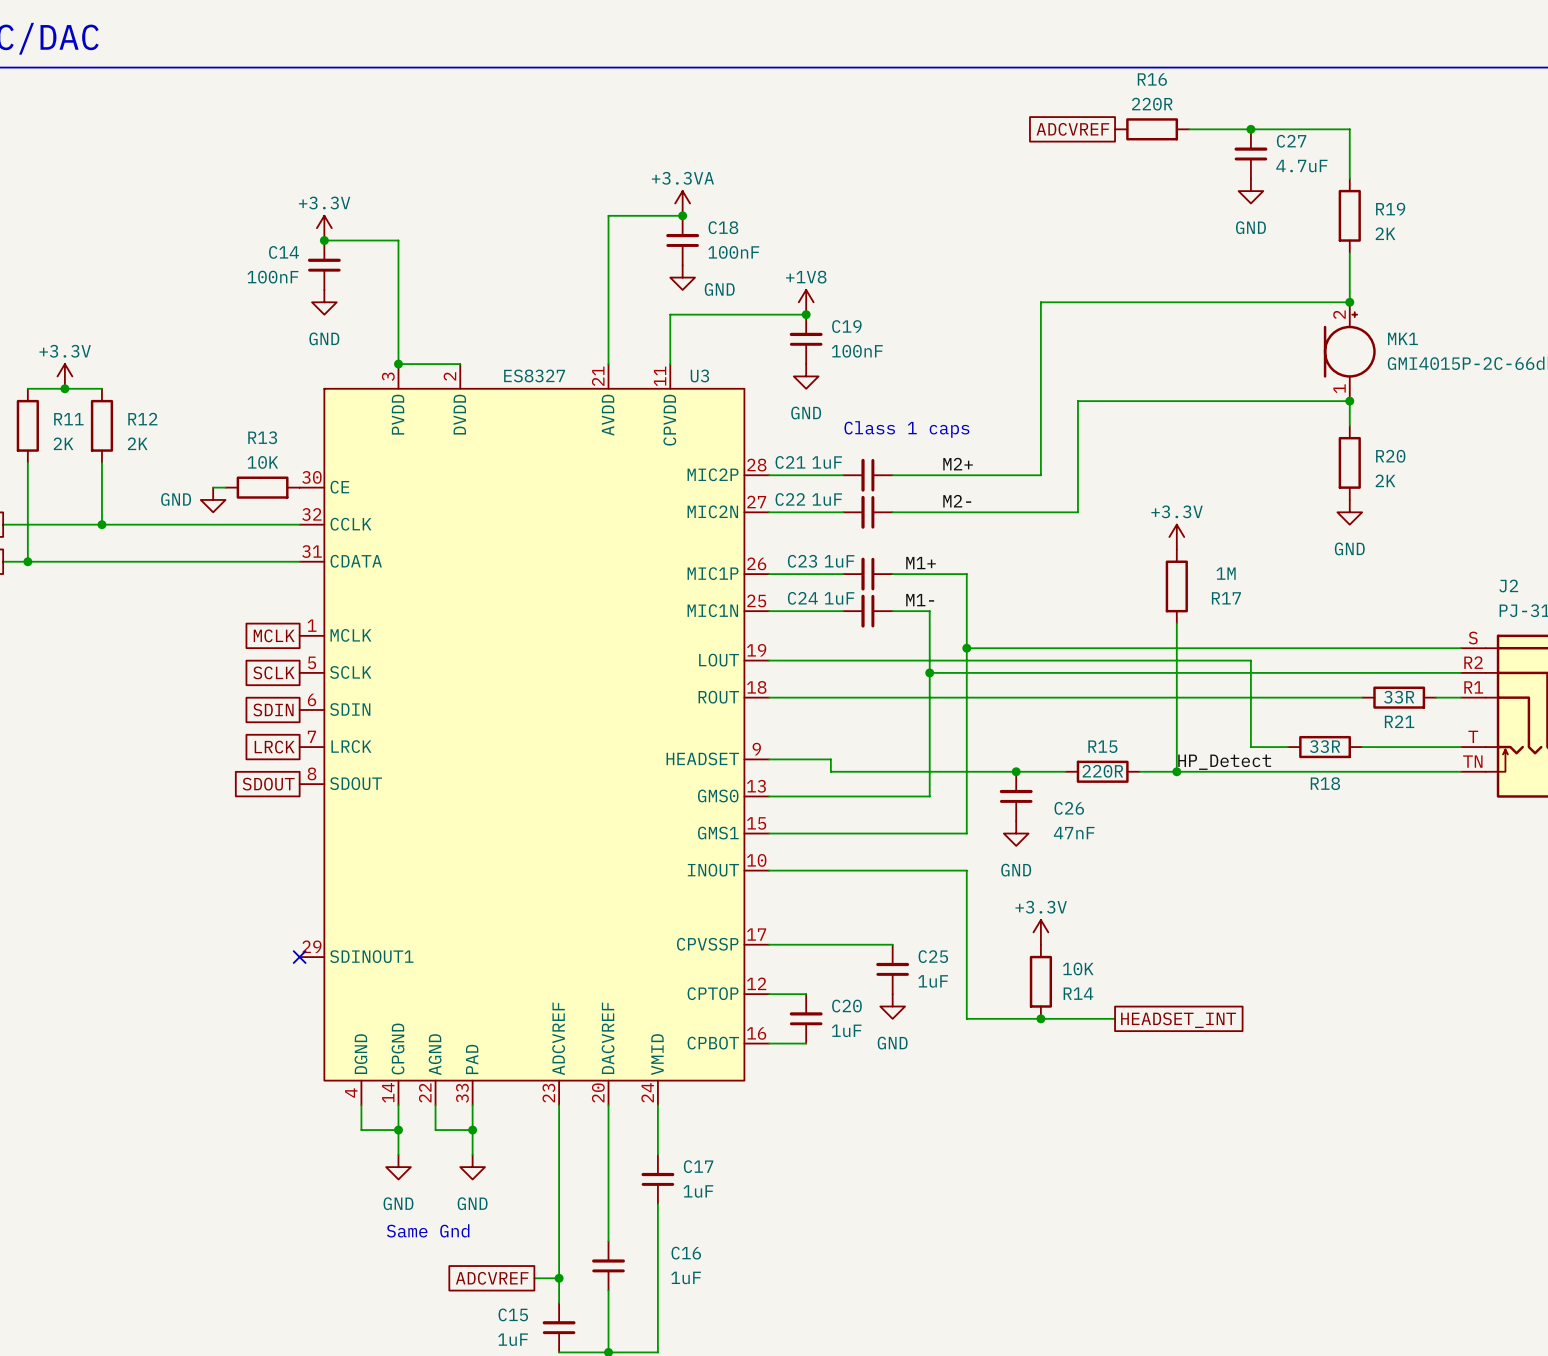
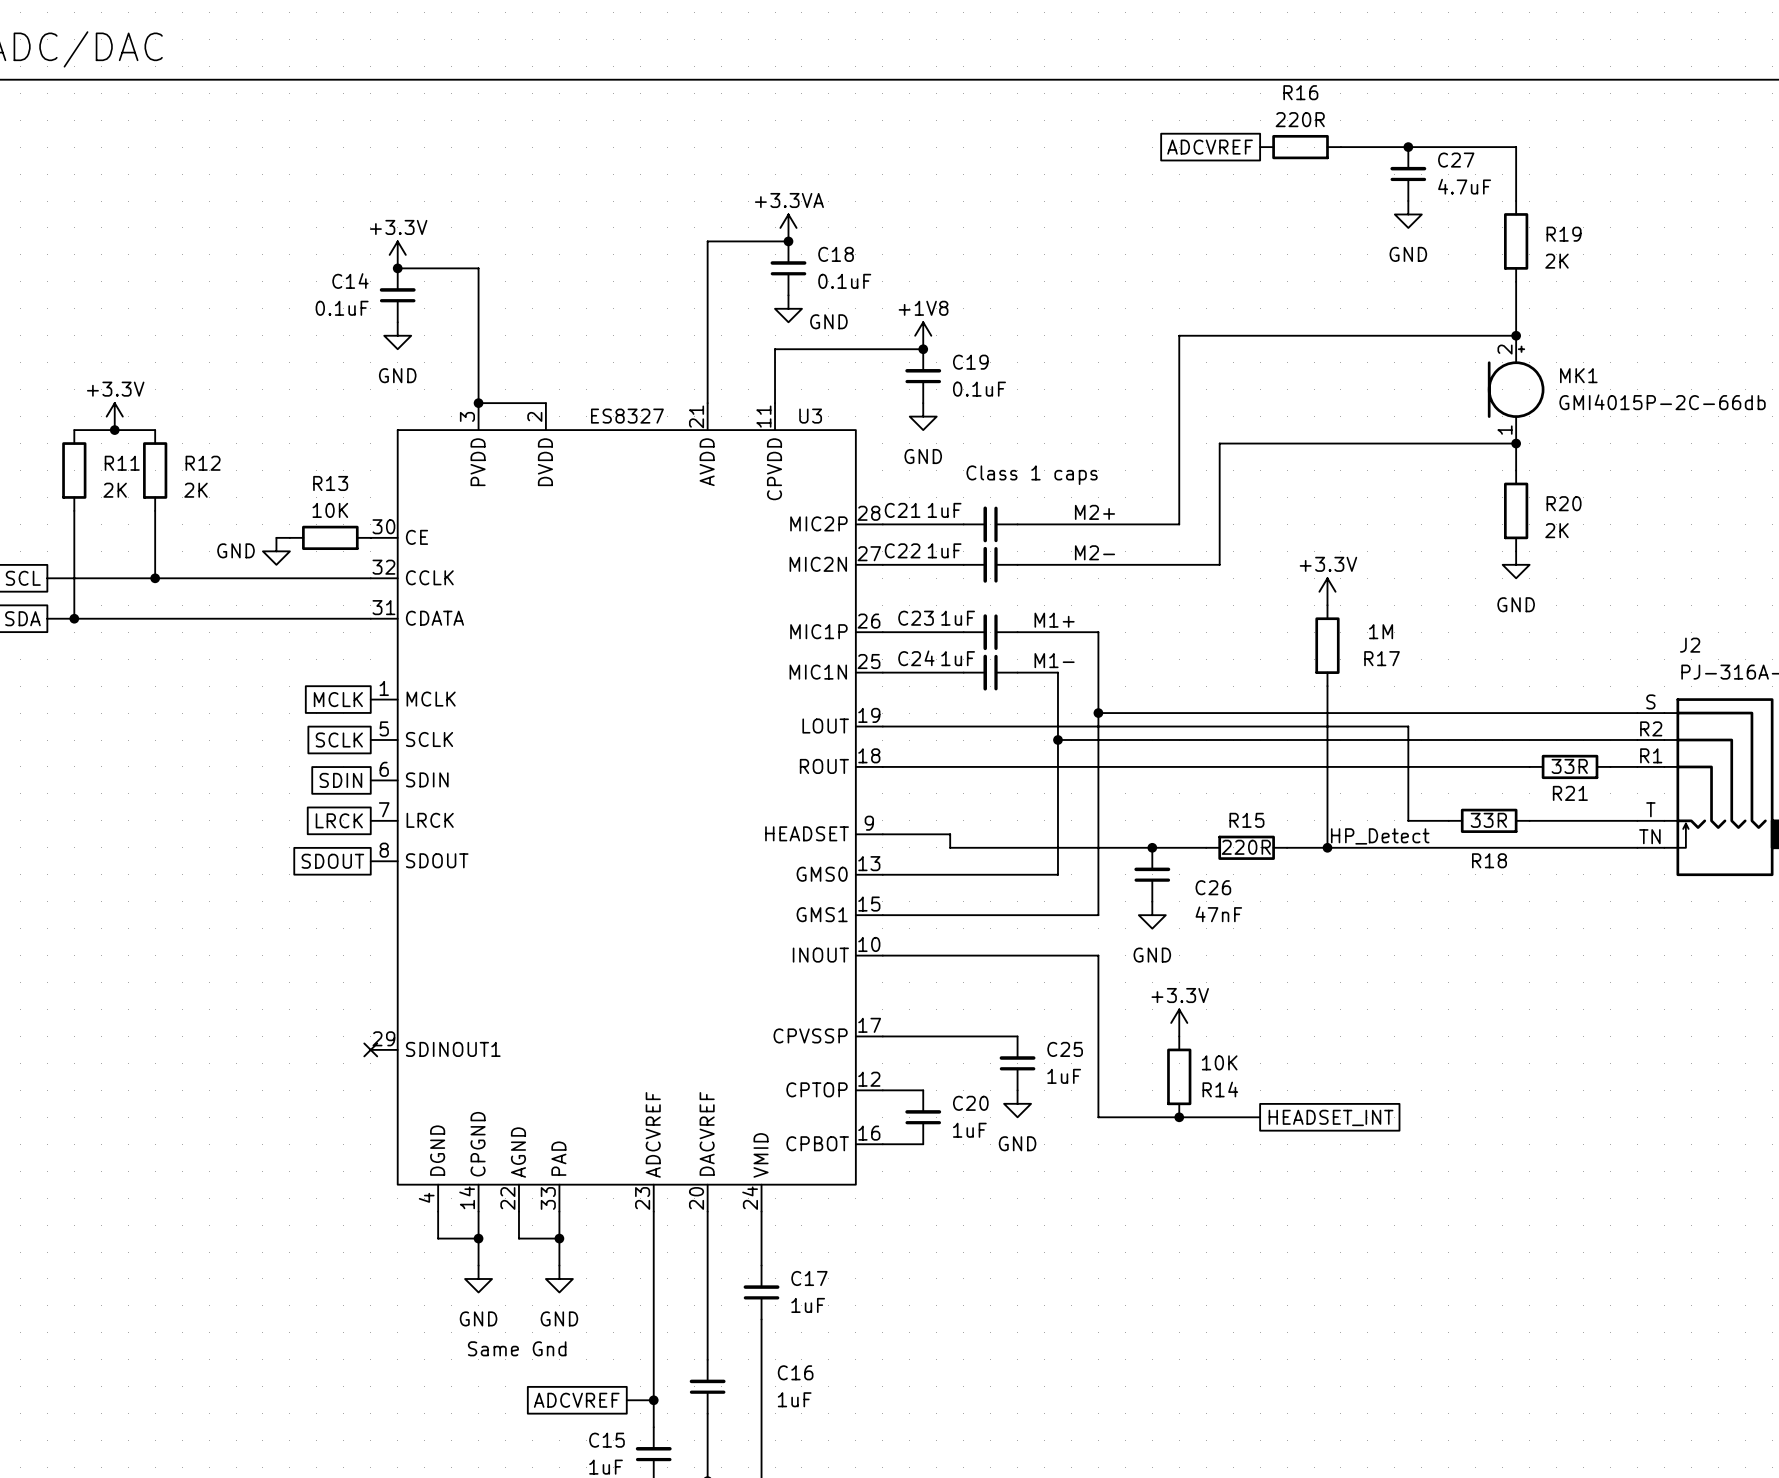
C18 value: 100nF (733, 252) -> 0.1uF (844, 281)
C14 value: 100nF (272, 277) -> 0.1uF (342, 308)
C19 value: 100nF (857, 351) -> 0.1uF (979, 389)

